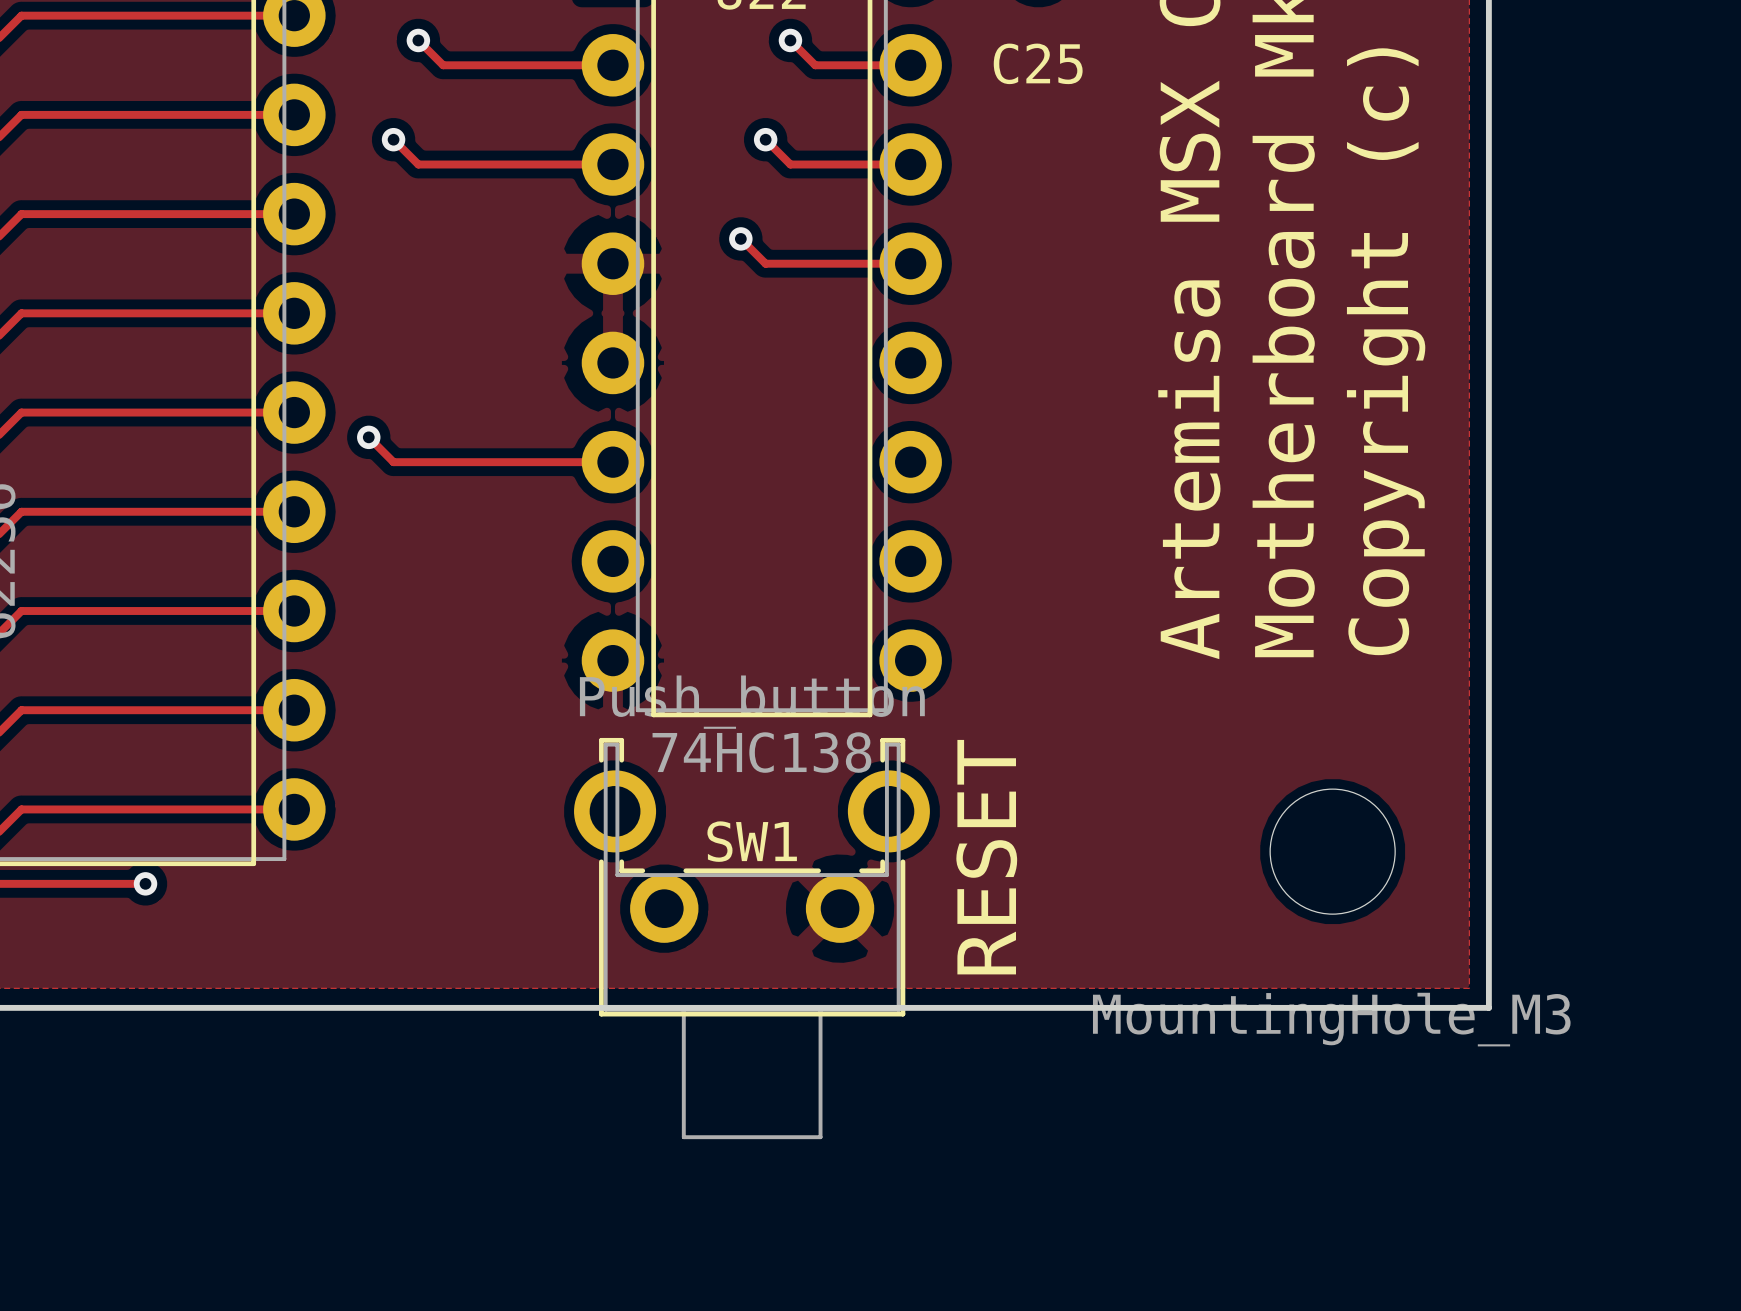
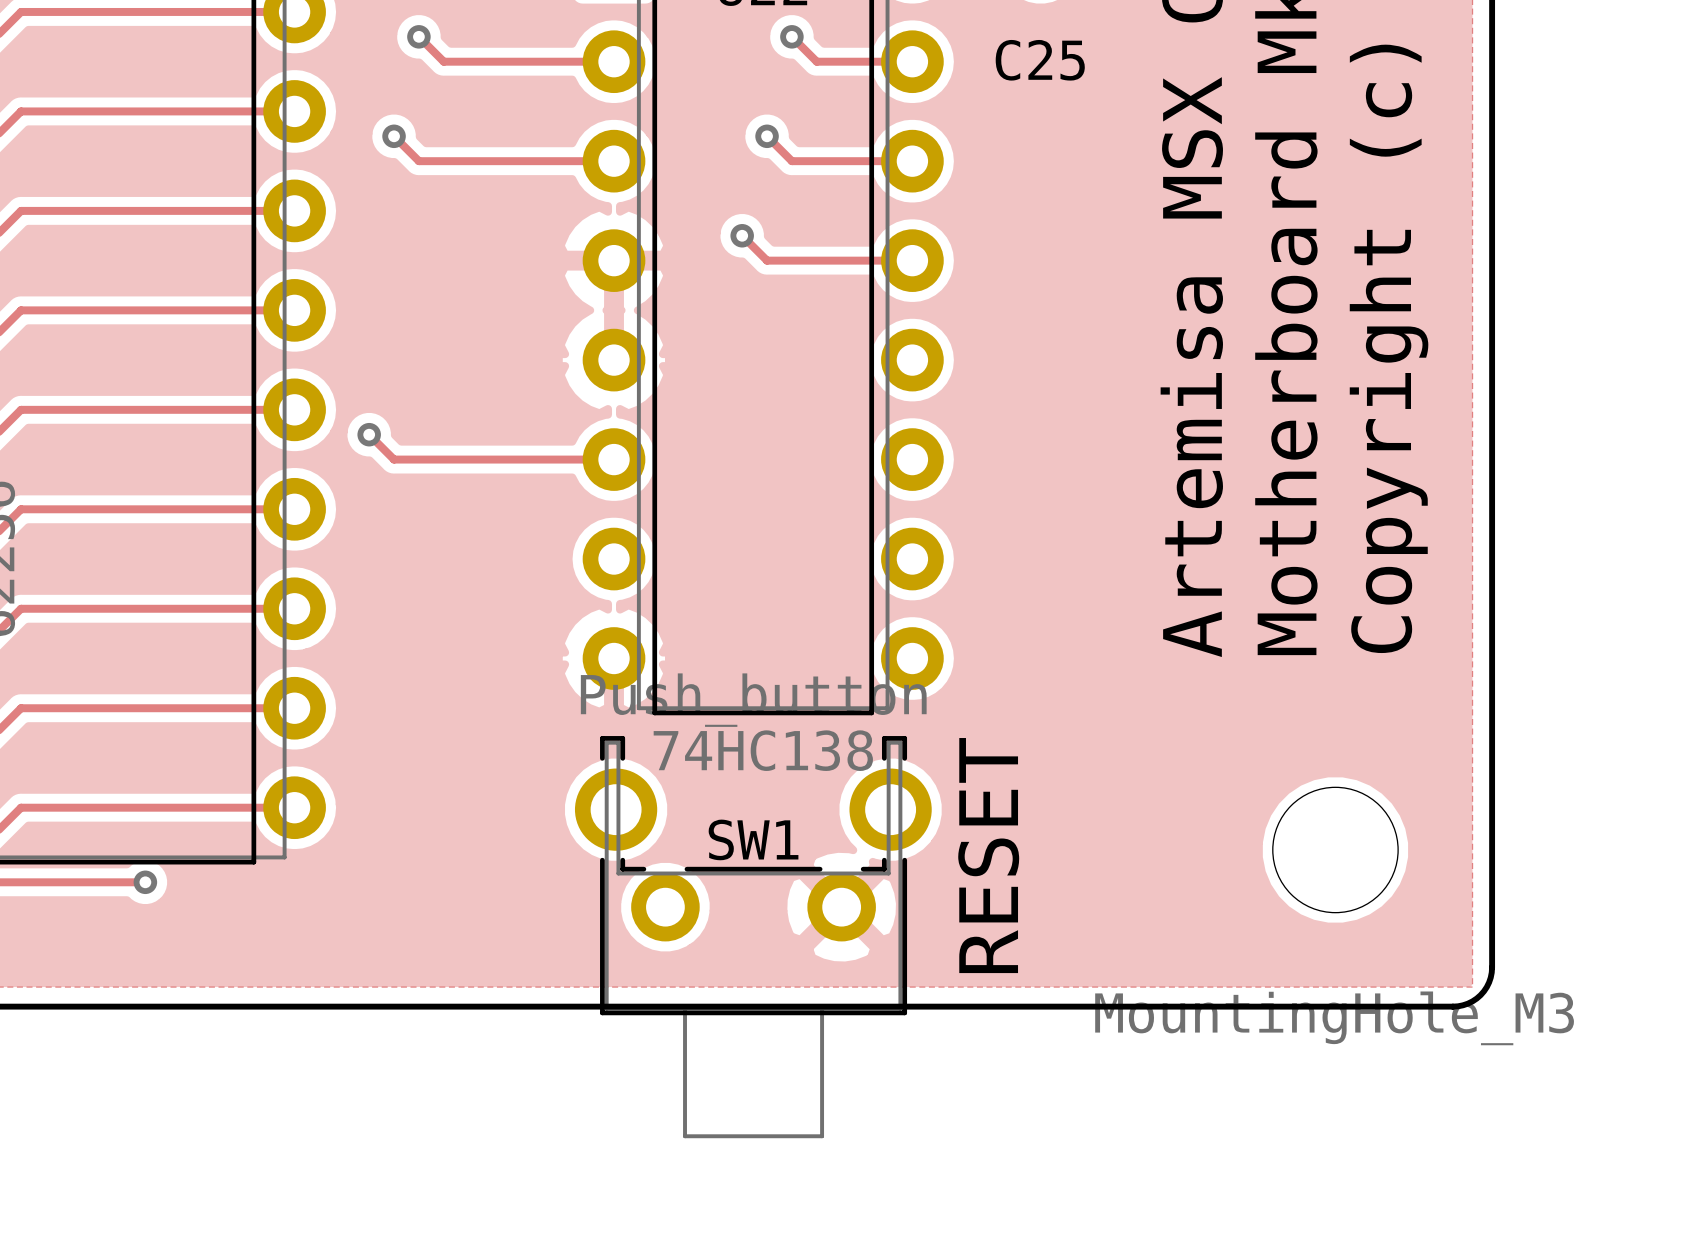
board edge: (1488, 968) (1488, 1007) (1449, 1007) -> (1492, 967) (1489, 982) (1480, 995) (1467, 1003) (1452, 1006)

